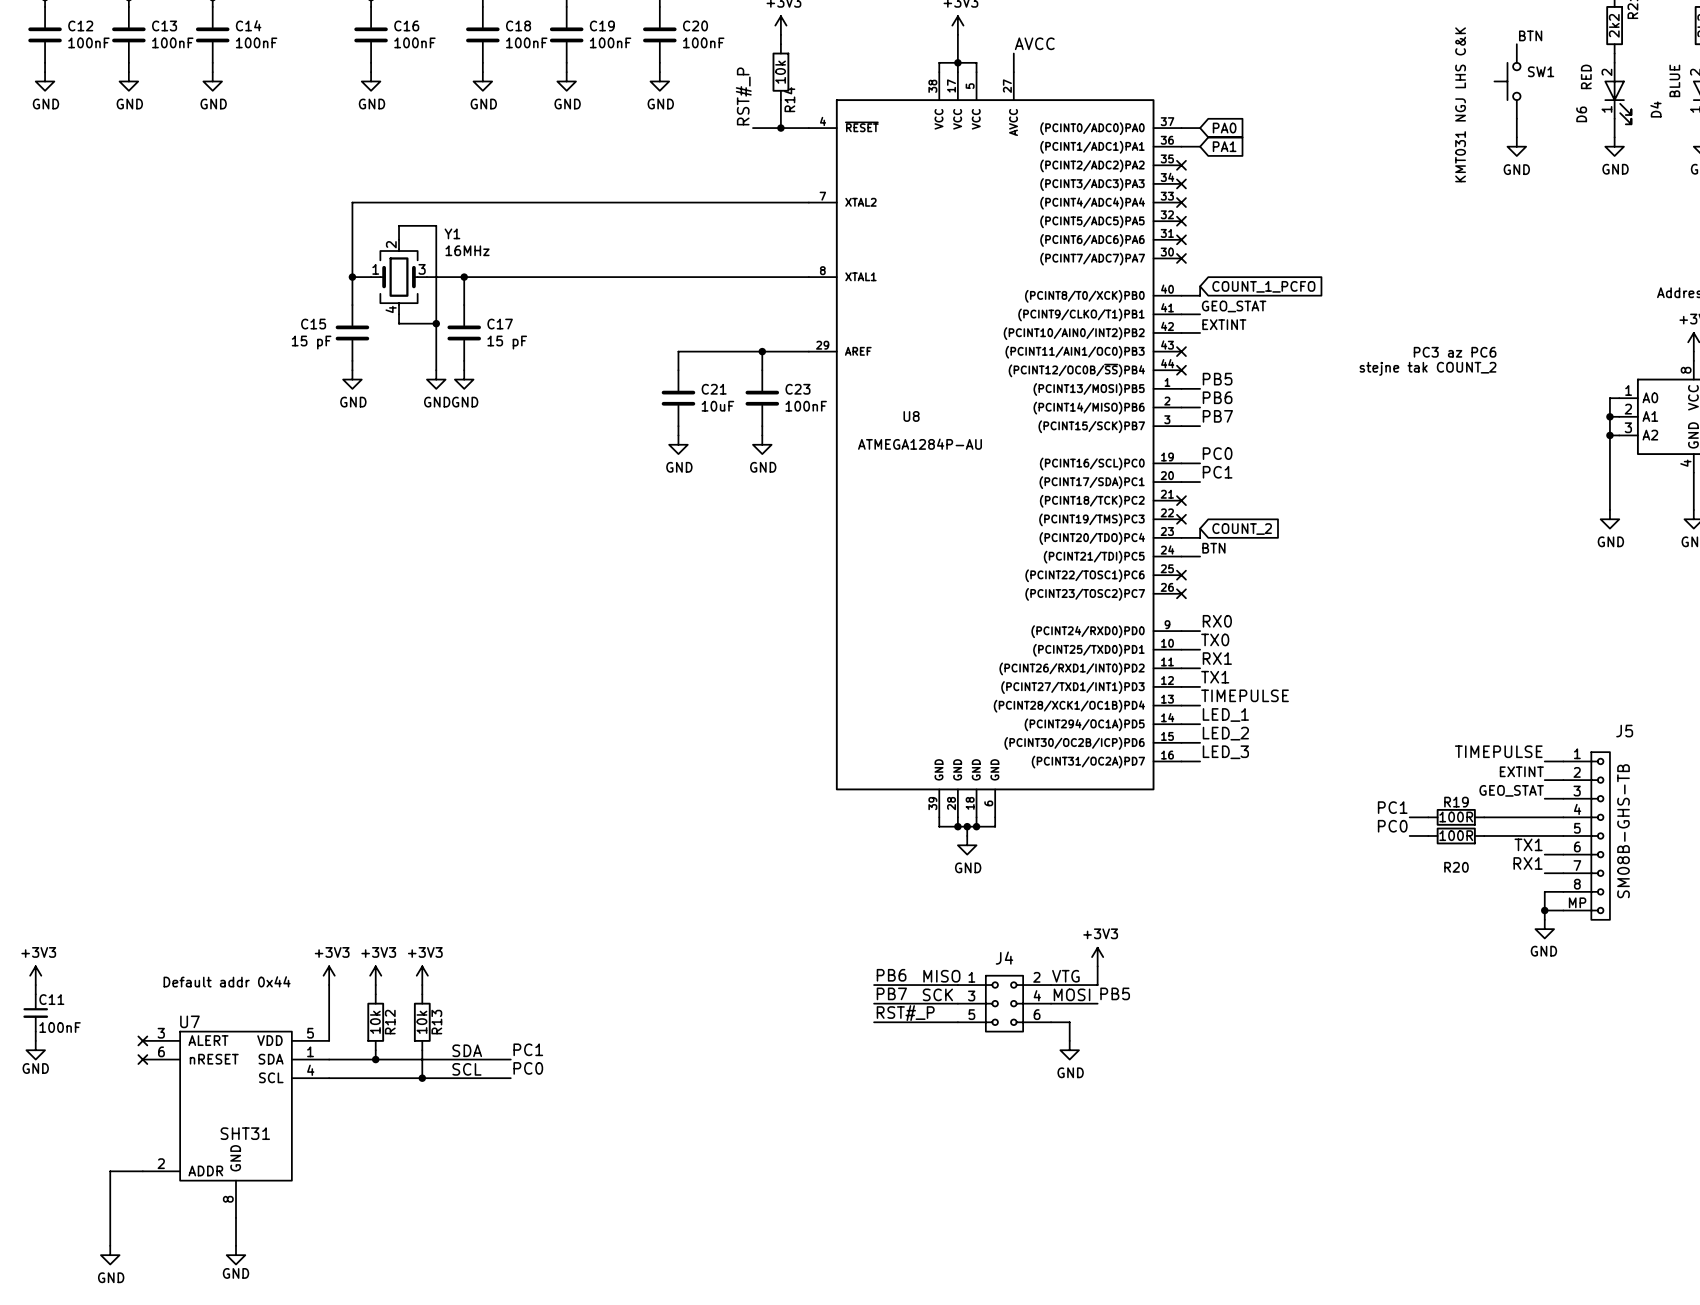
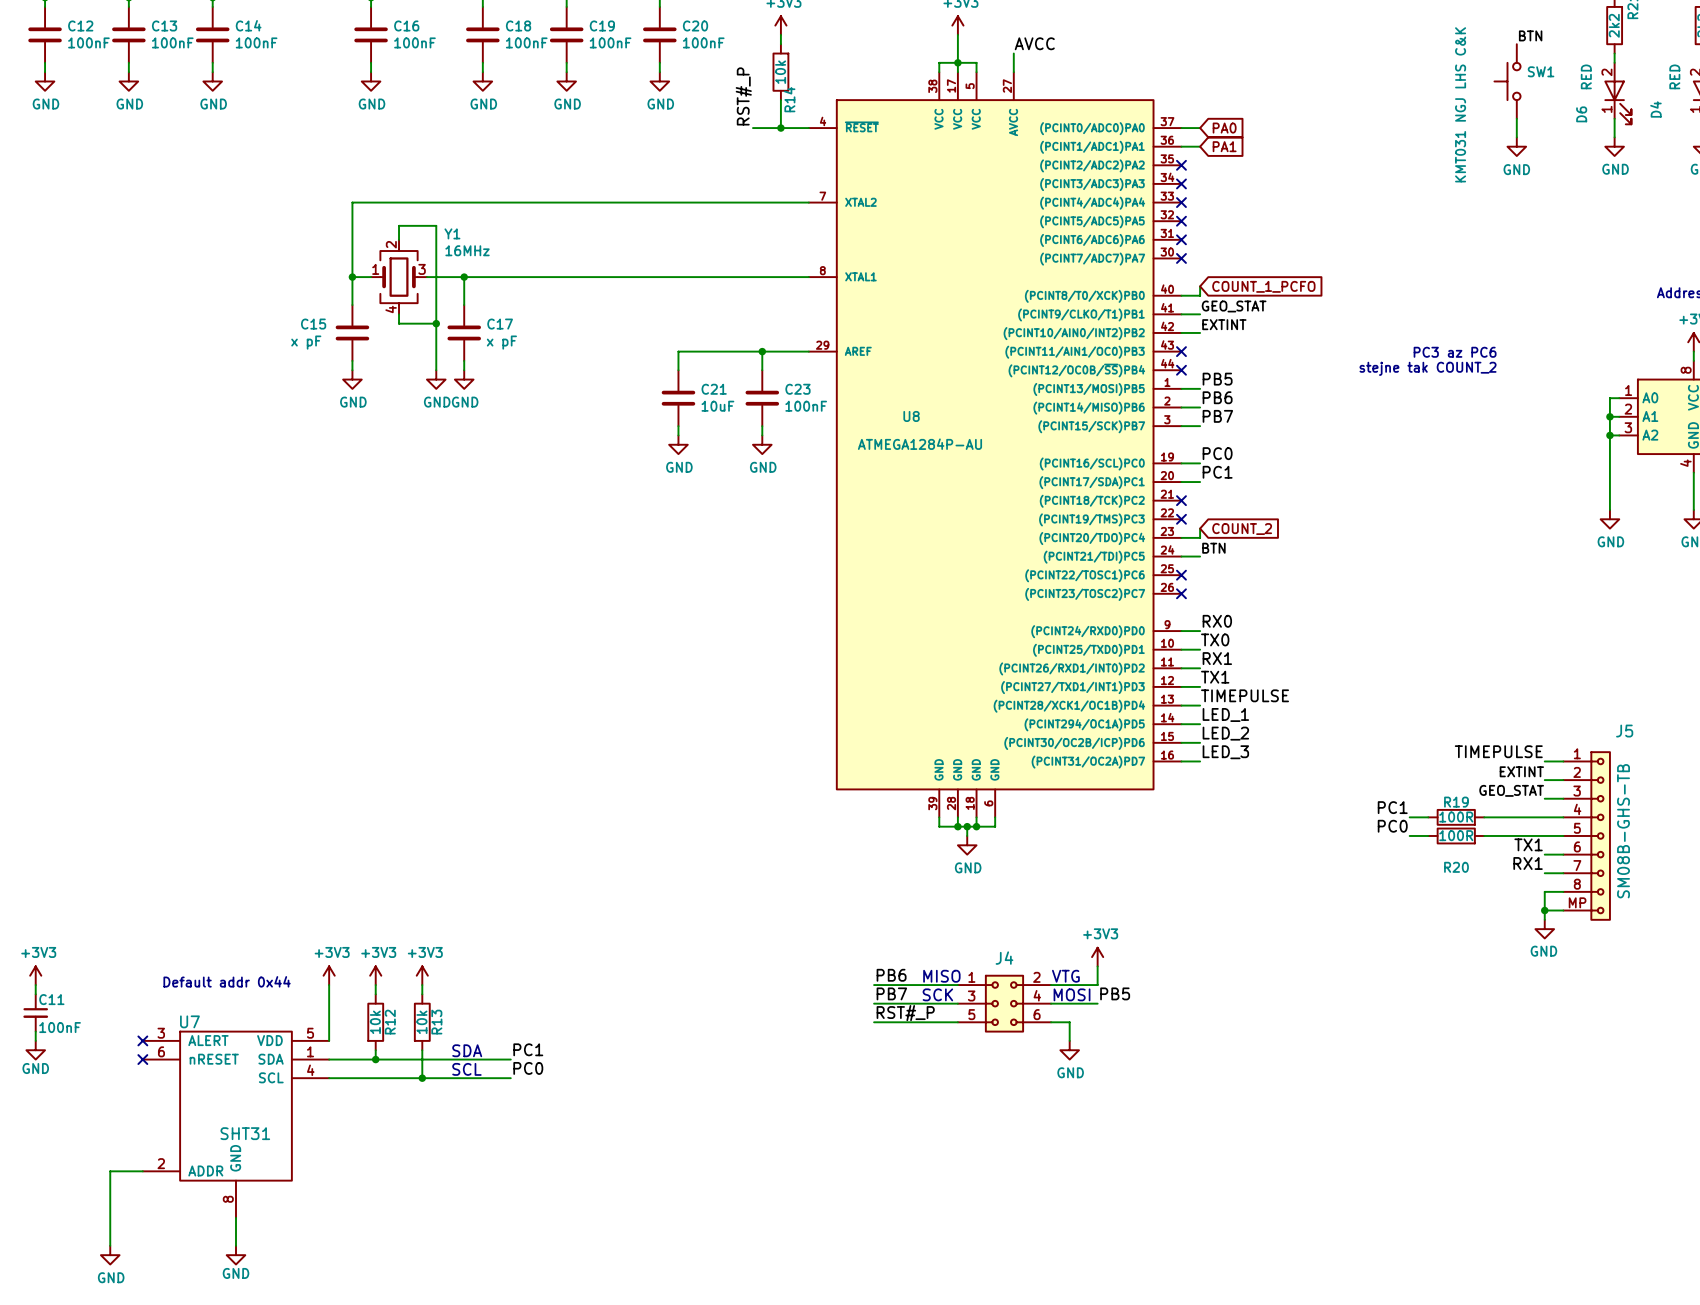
D4 value: BLUE (1674, 80) -> RED (1674, 76)
C15 value: 15 pF (311, 342) -> x pF (306, 342)
C17 value: 15 pF (507, 342) -> x pF (501, 342)

